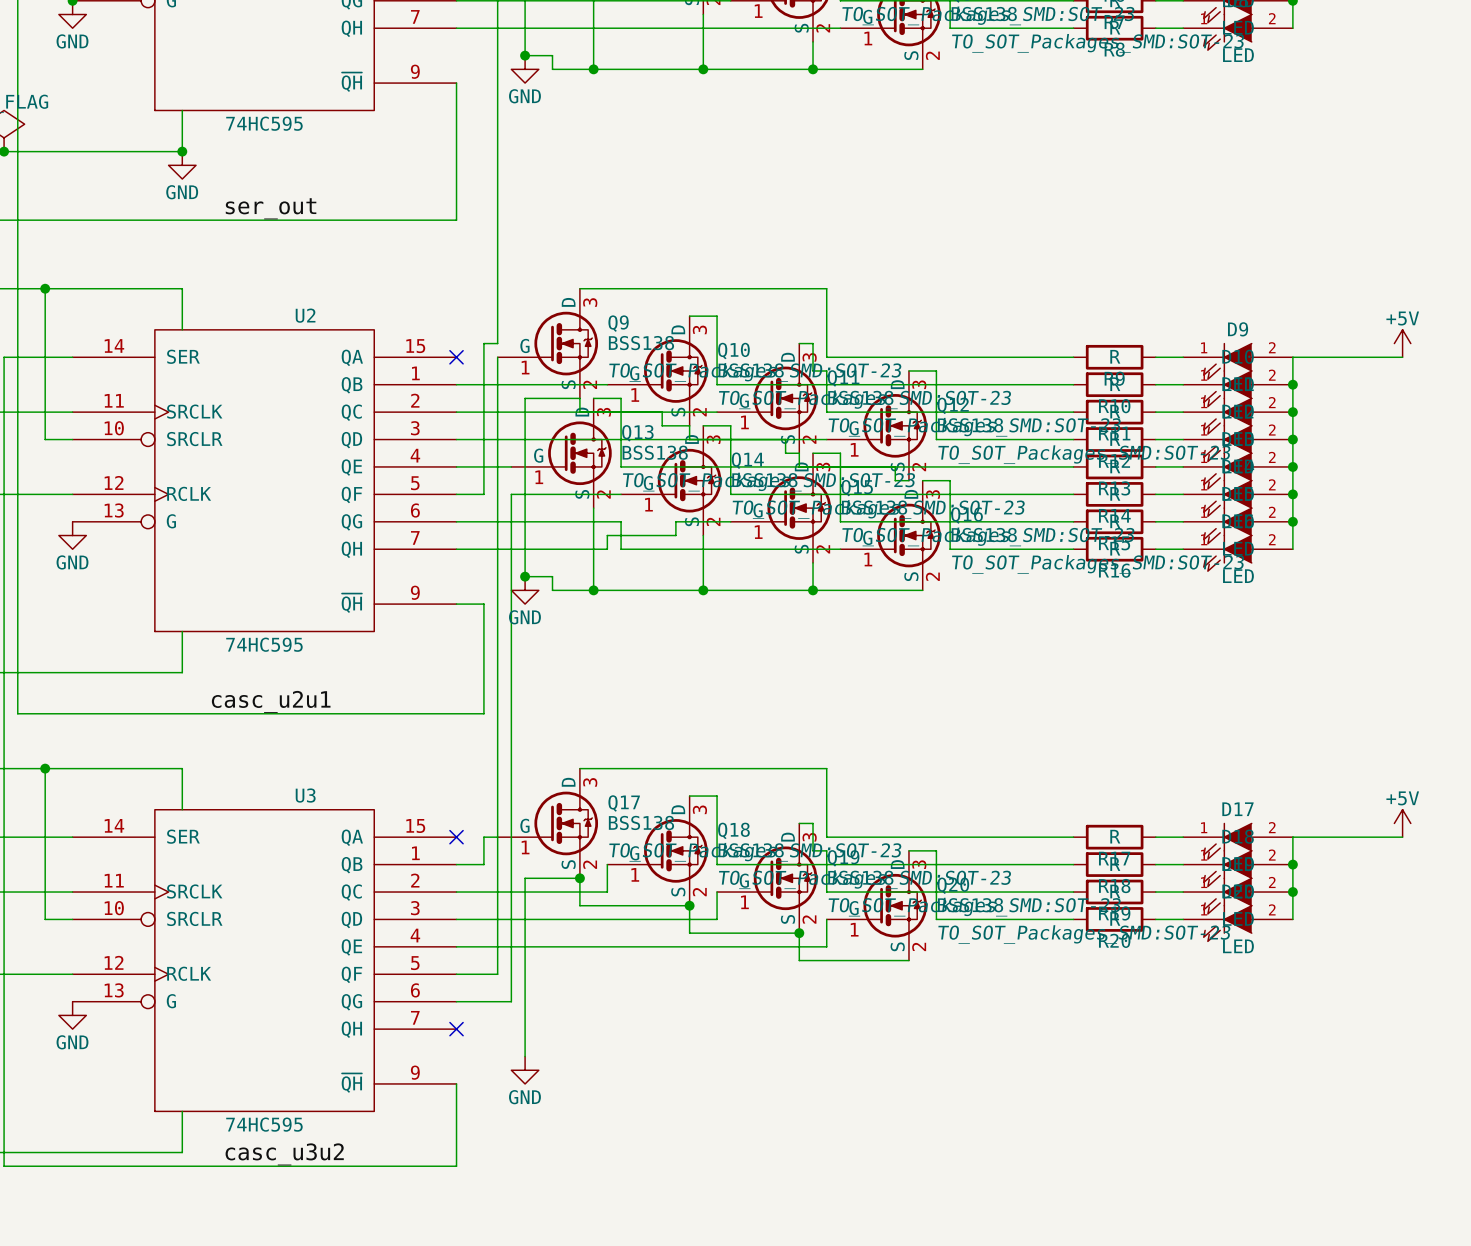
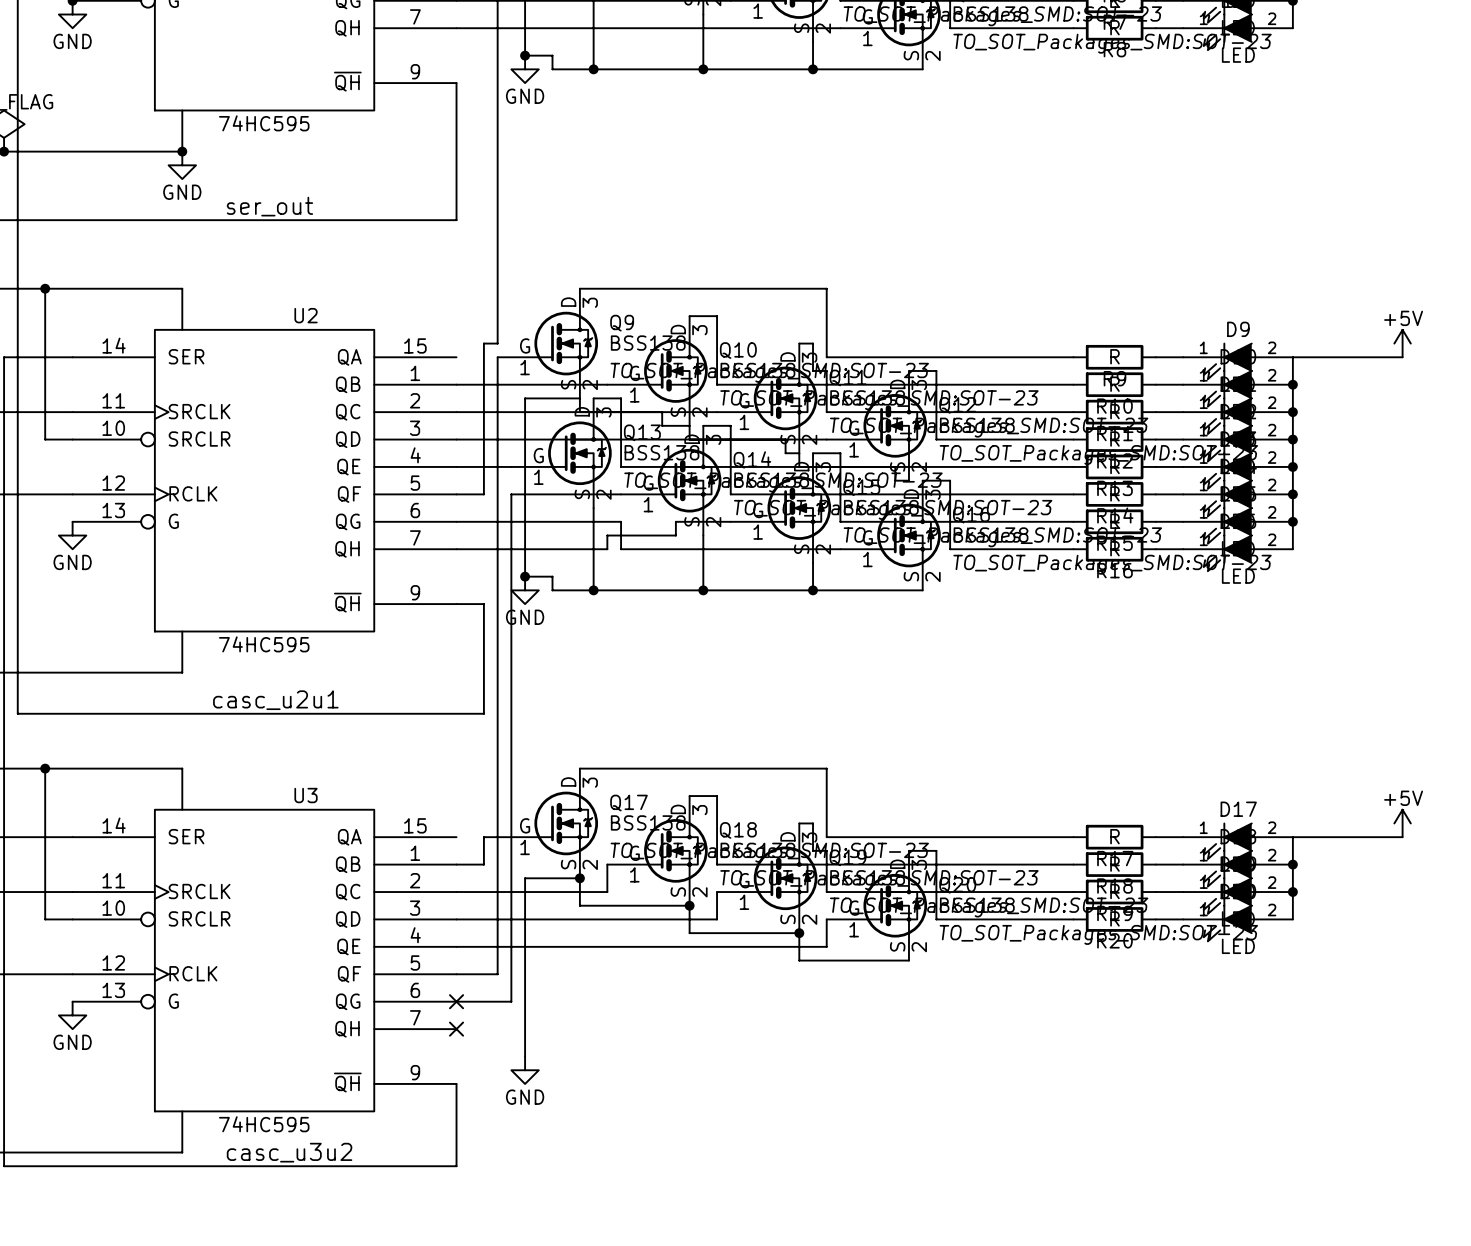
no-connect mark: (456, 357) -> none
no-connect mark: (456, 837) -> none
no-connect mark: none -> (456, 1001)

